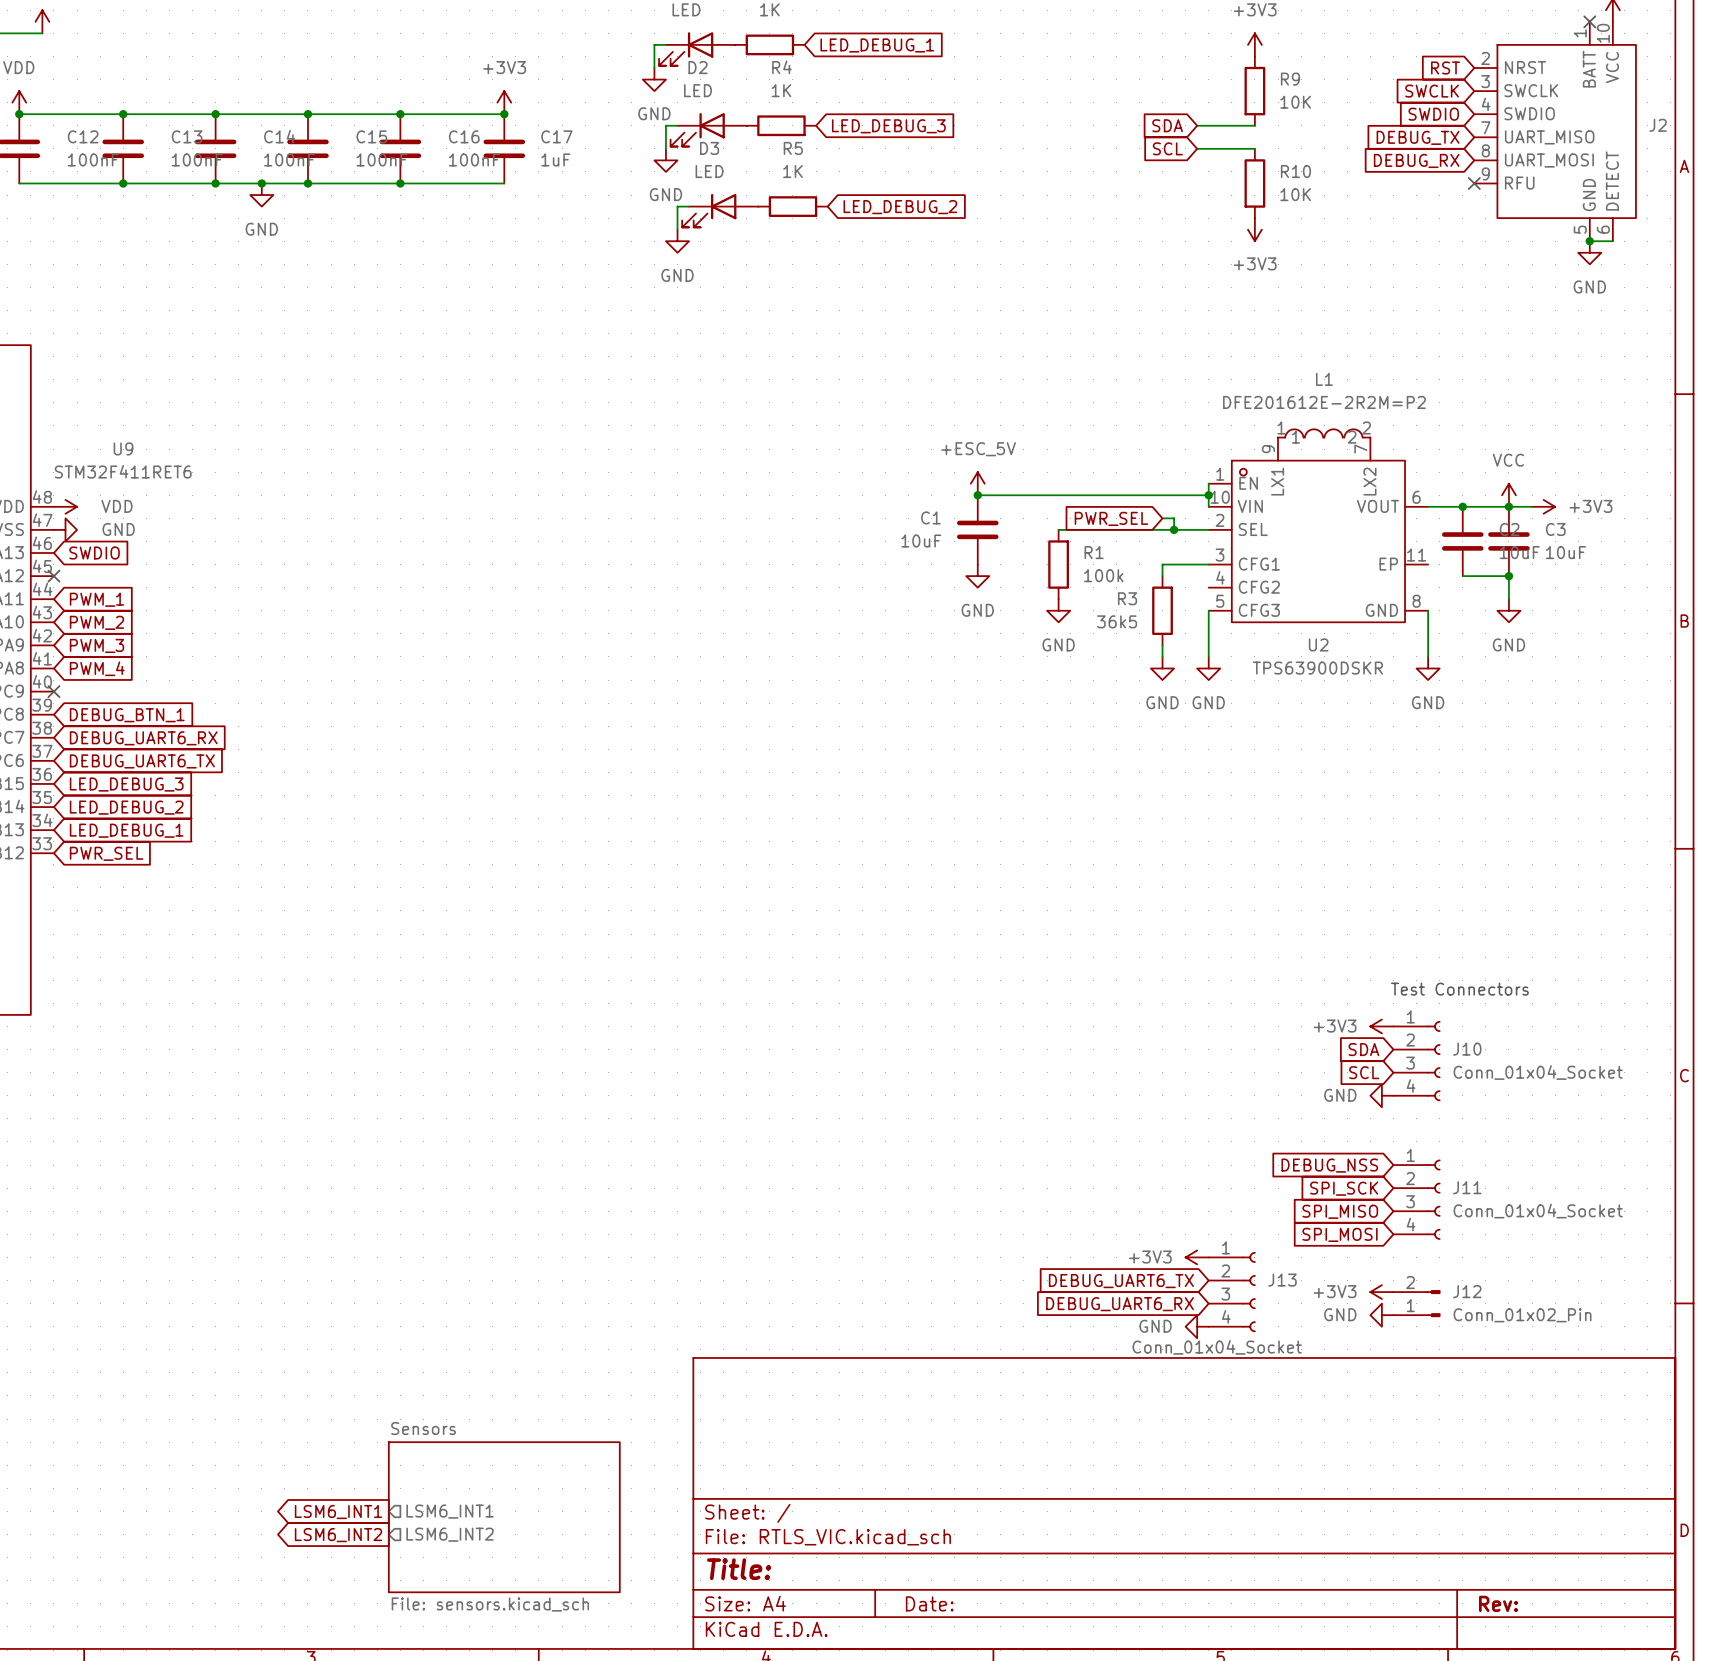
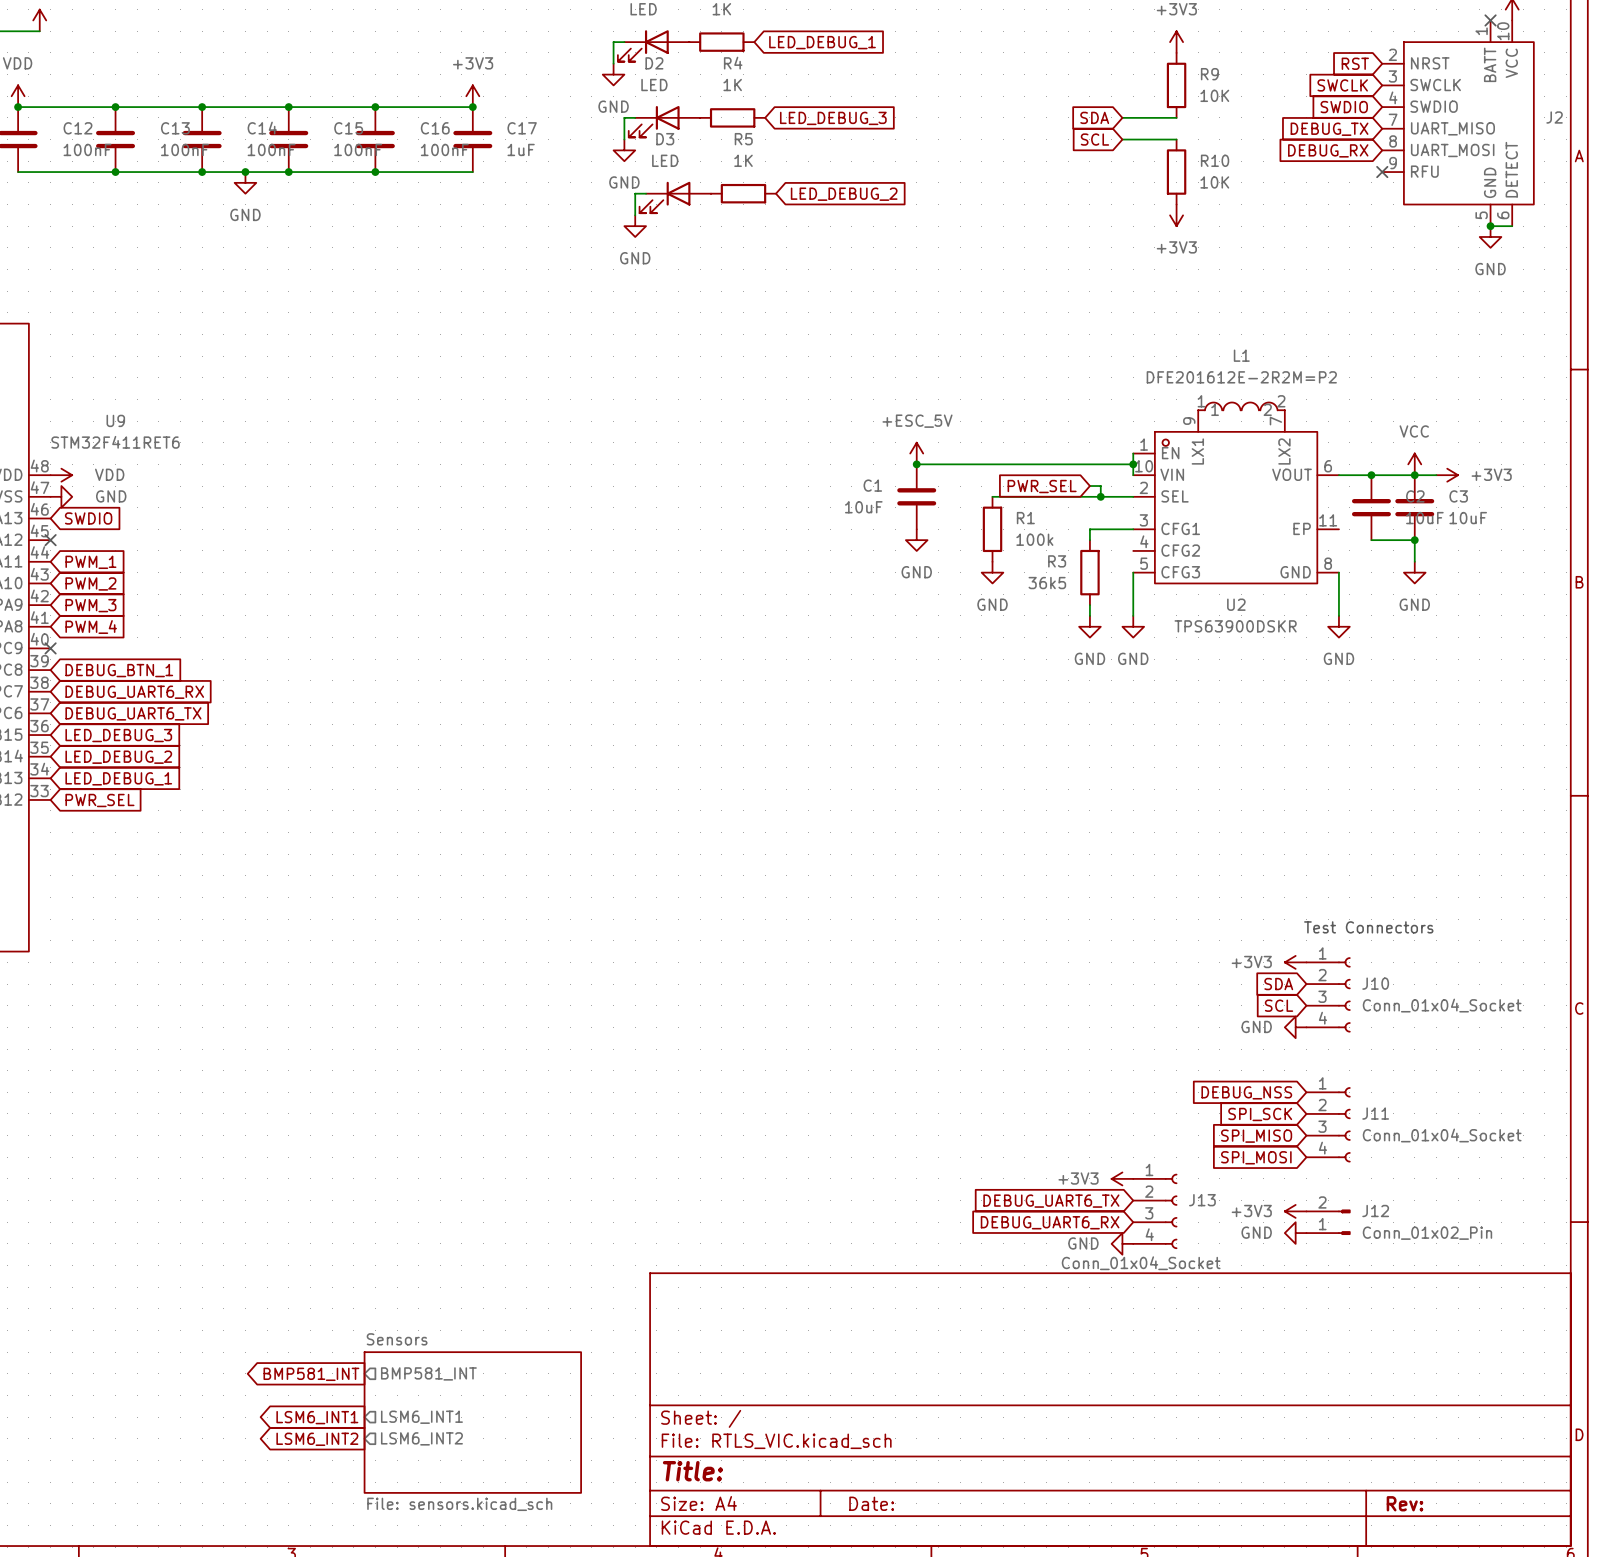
global label: none -> BMP581_INT (311, 1374)
sheet pin: none -> BMP581_INT (428, 1373)

